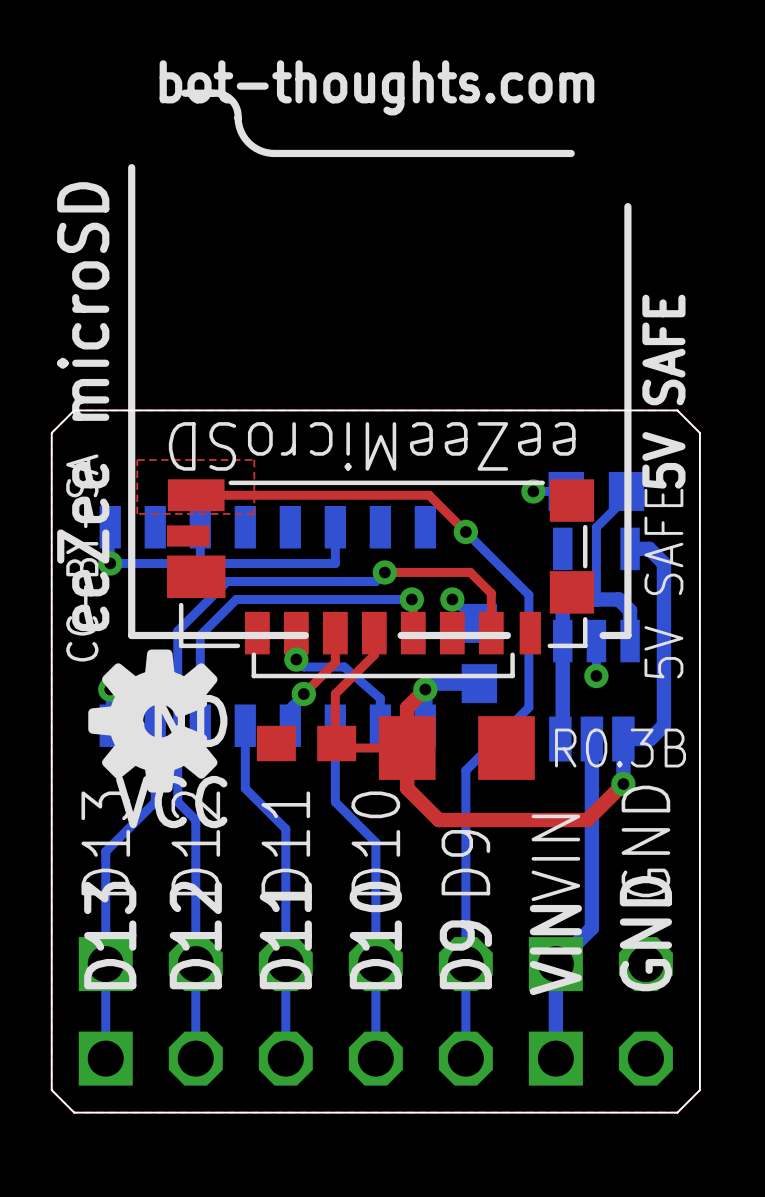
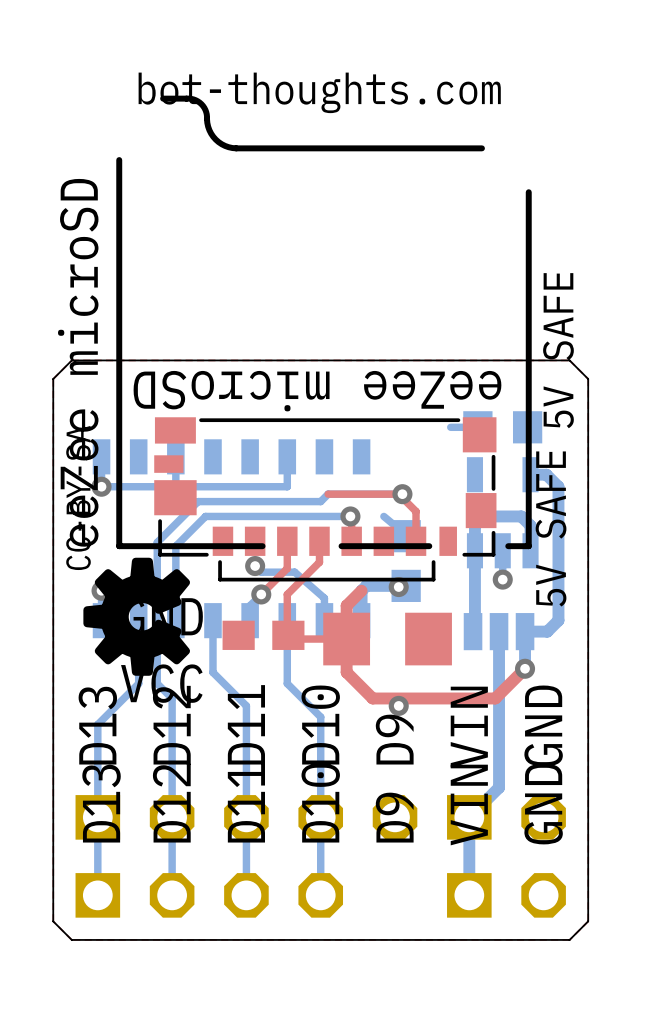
text: eeZeeMicroSD (372, 446) -> eeZee microSD (317, 391)
top zone outline: (137, 459) (254, 459) (254, 513) (137, 513) (137, 459) -> none
part footprint: [167, 479, 595, 679] -> [154, 417, 497, 582]
via: (533, 491) -> none
bottom track: (626, 491) (626, 497) (596, 527) (596, 599) -> none
top track: (196, 495) (429, 495) (465, 531) -> none
bottom track: (465, 531) (528, 594) (528, 707) (465, 770) (465, 1058) -> none
via: (465, 531) -> none
via: (384, 572) -> none
via: none -> (402, 494)
text position: 5V SAFE (663, 583) -> 5V SAFE (551, 528)
via: (452, 599) -> none
via: none -> (398, 587)
via: (425, 689) -> none
text: R0.3B (620, 748) -> none
via: none -> (398, 705)
part: (285, 1058) -> none

